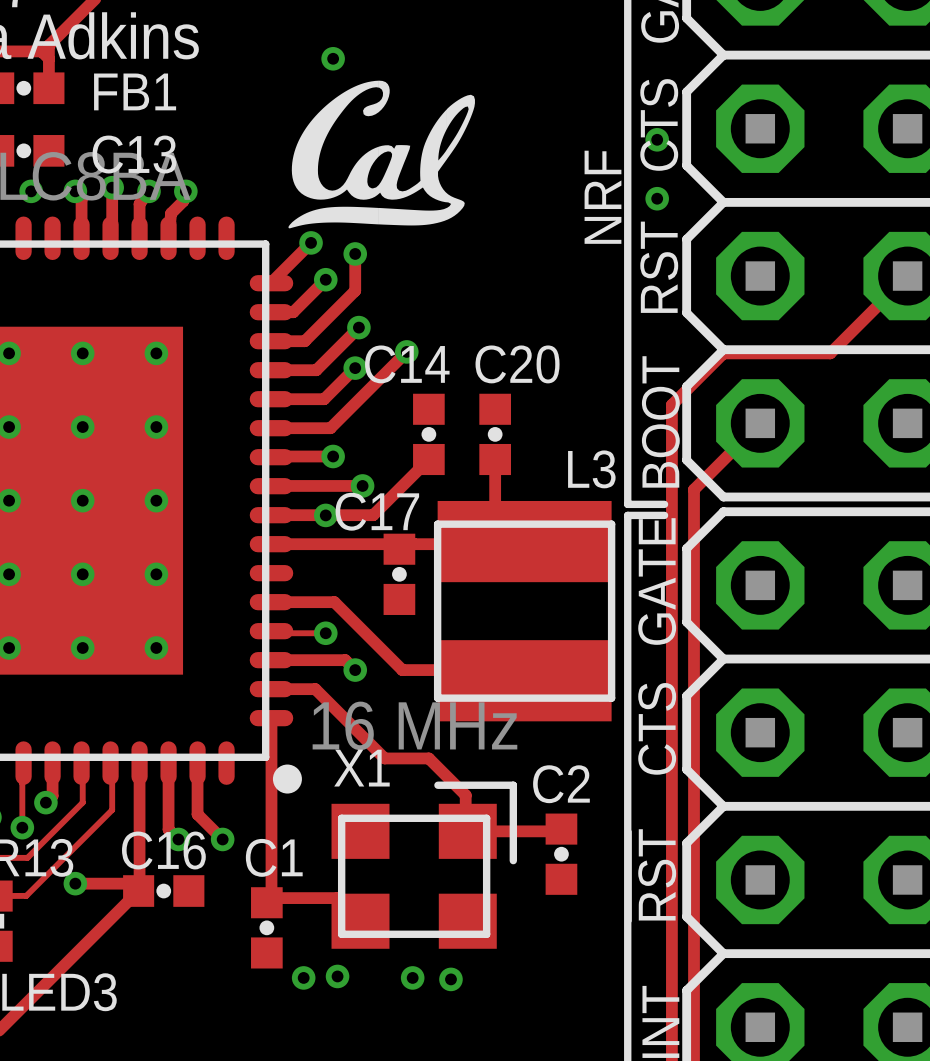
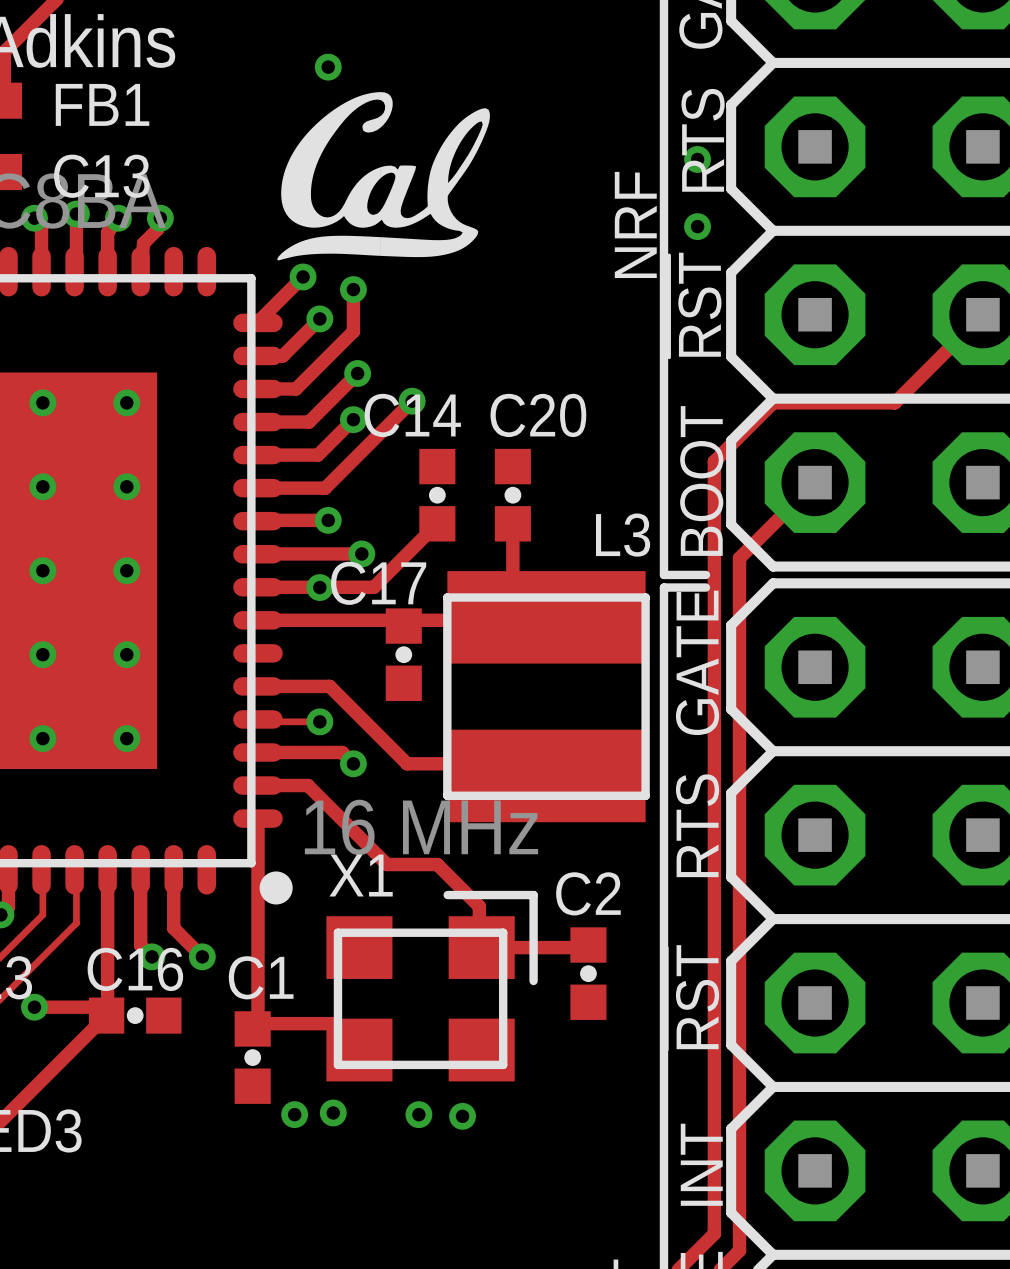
text: CTS (659, 124) -> RTS (703, 140)
text: RST (659, 267) -> ~{RST} (695, 305)
text: CTS (657, 728) -> RTS (697, 825)

